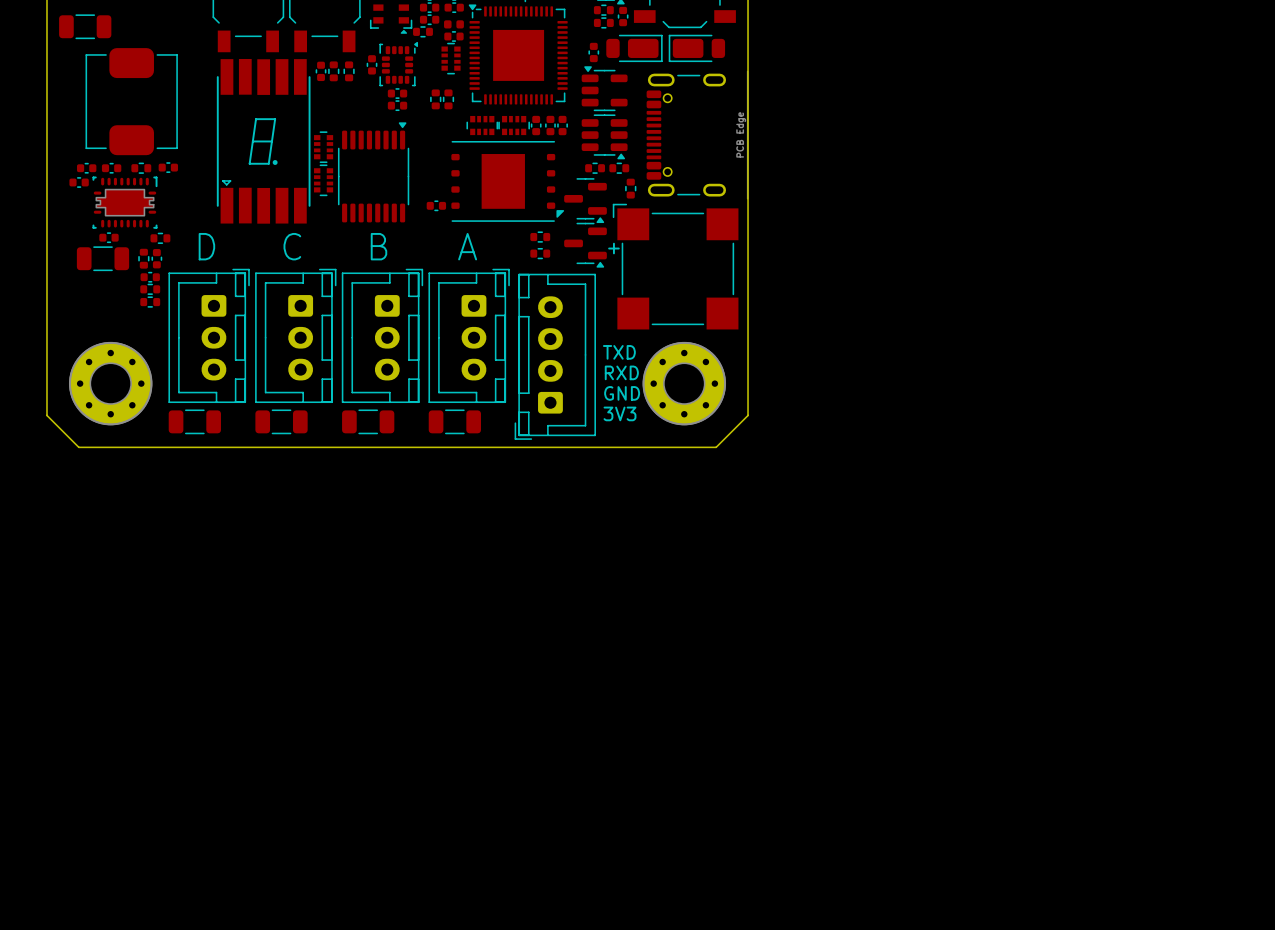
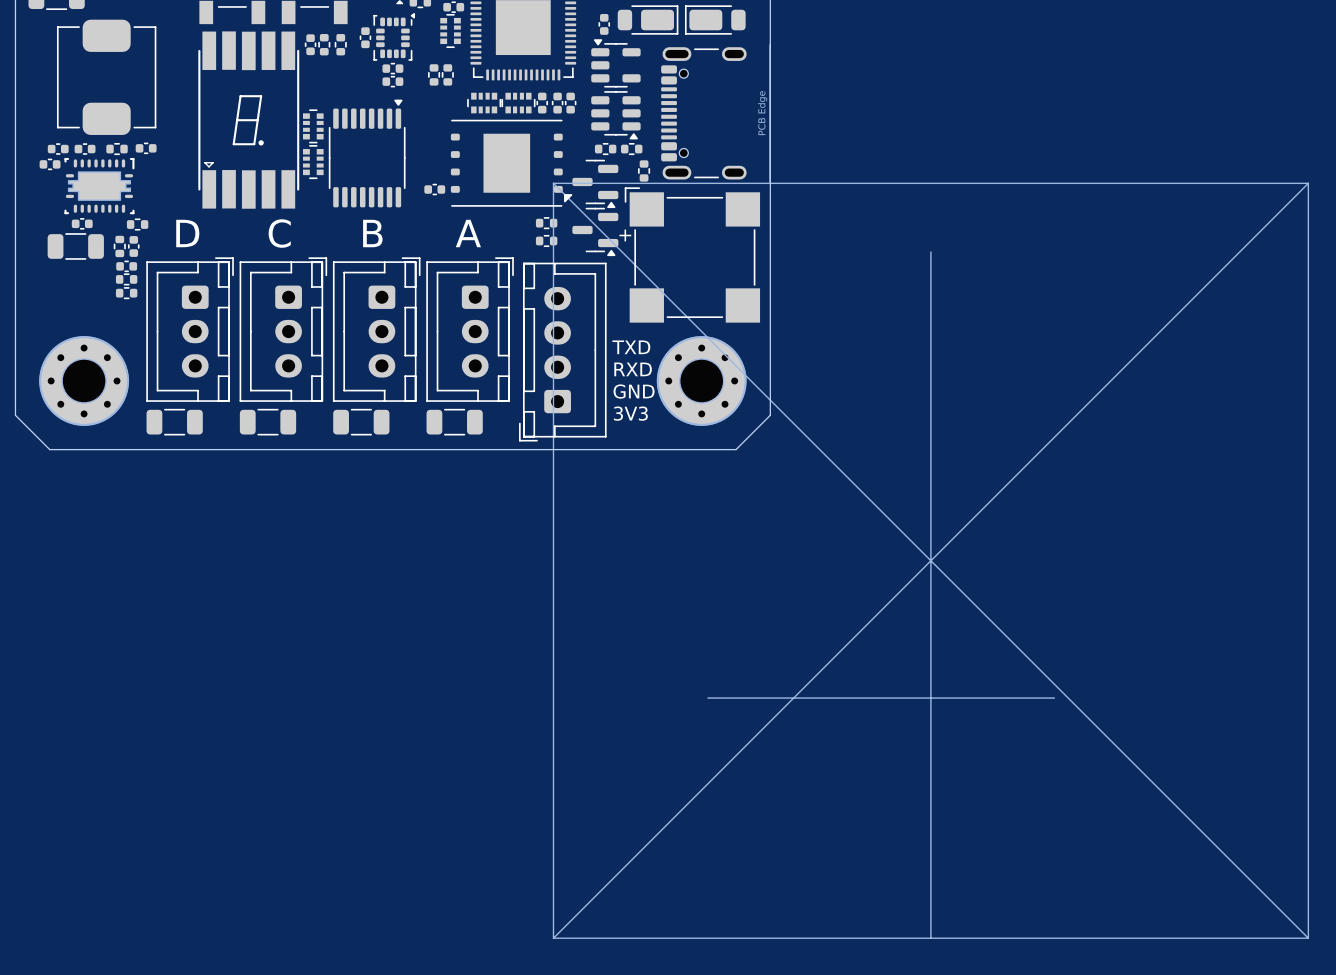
line: none -> (553, 183) (1308, 183)
line: none -> (553, 183) (553, 938)
line: none -> (553, 183) (1308, 938)
line: none -> (1308, 183) (1308, 938)
line: none -> (1308, 183) (553, 938)
line: none -> (930, 251) (930, 938)
line: none -> (707, 698) (1054, 698)
line: none -> (553, 938) (1308, 938)

